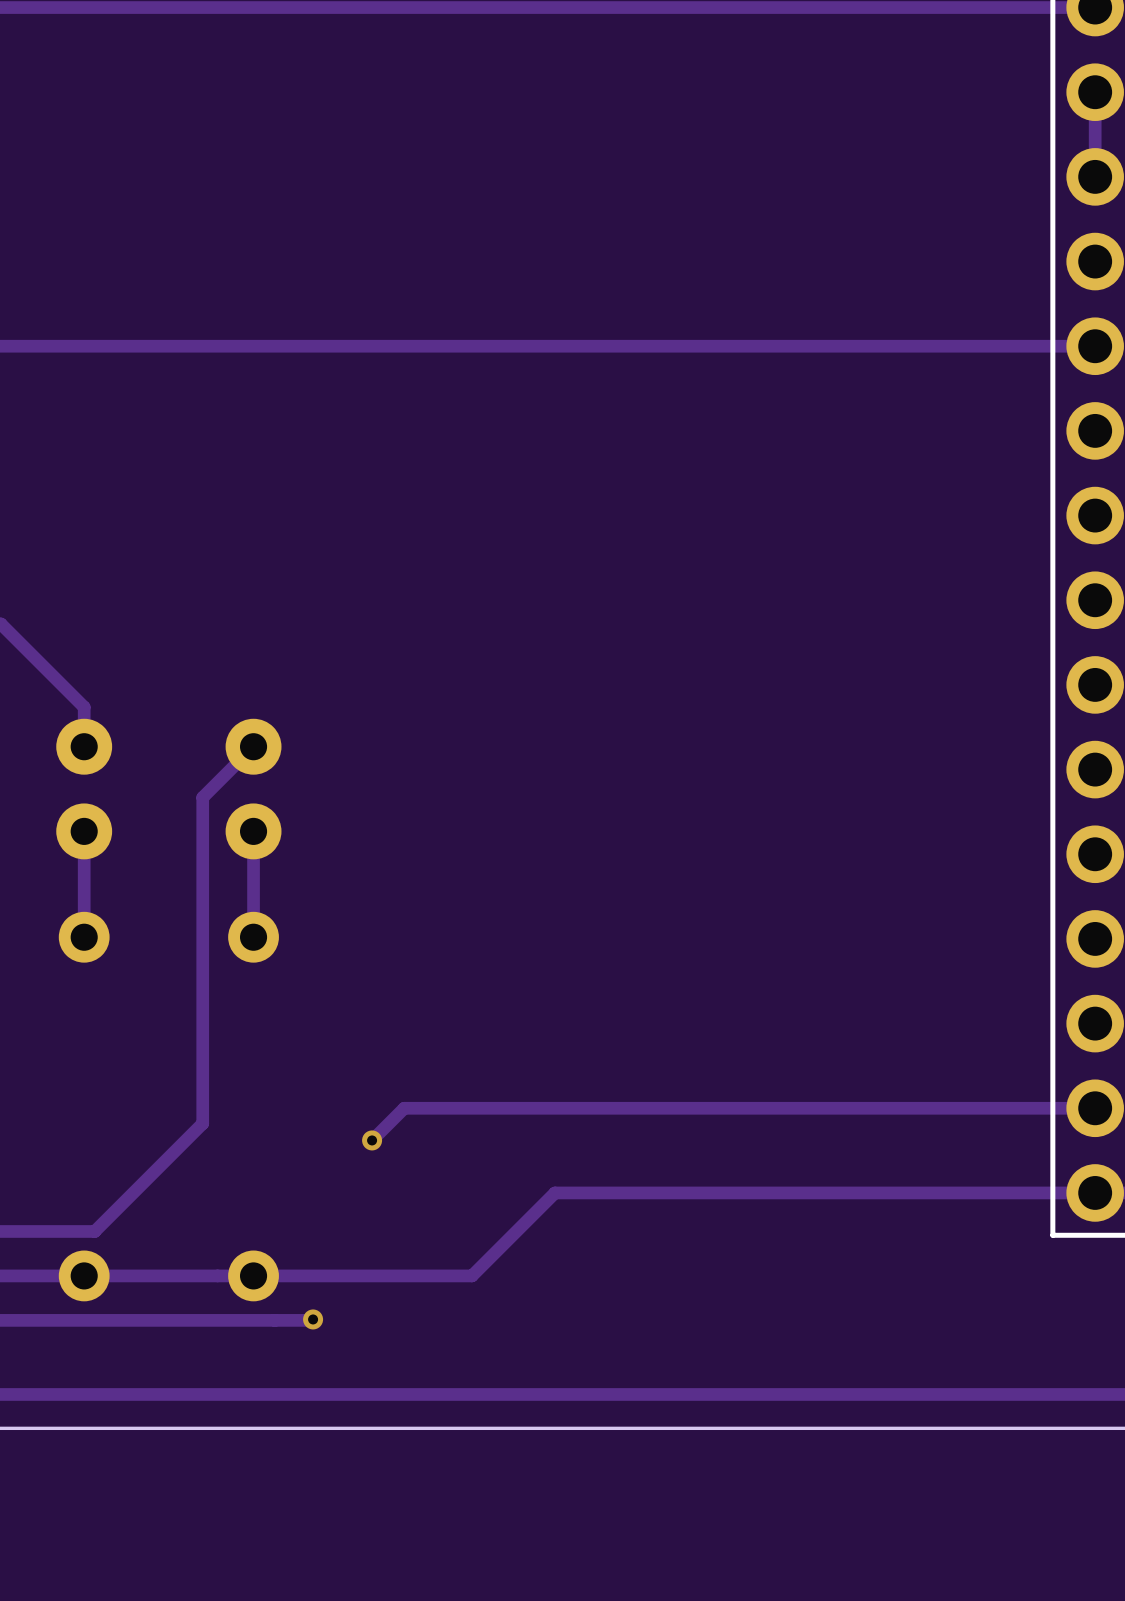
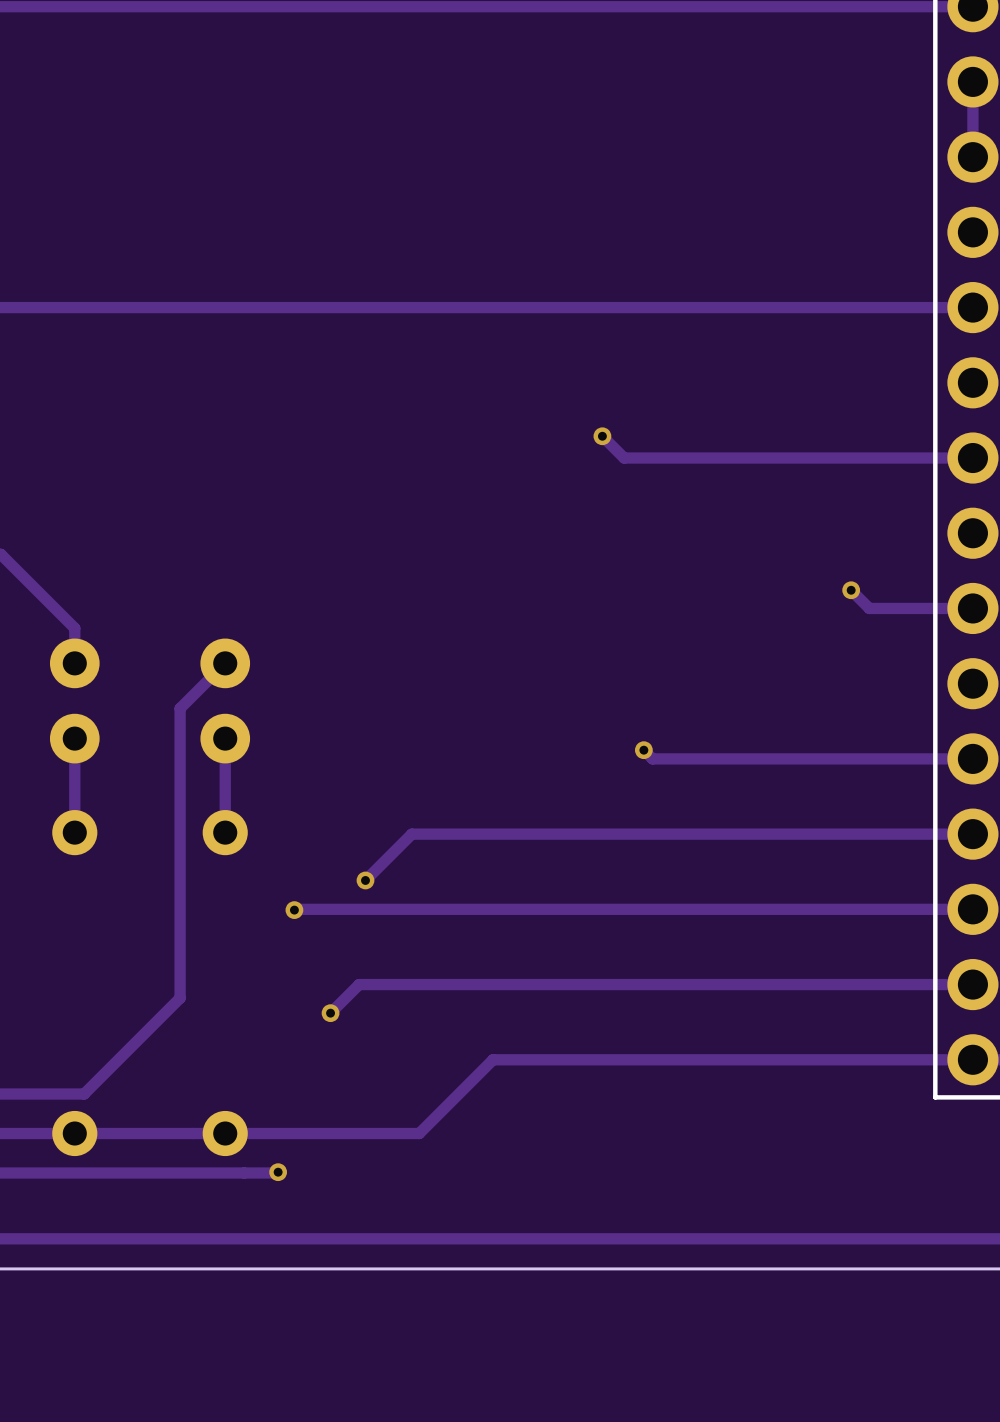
track: none -> (602, 436) (624, 458) (972, 458)
via: none -> (602, 436)
track: none -> (851, 590) (869, 608) (972, 608)
via: none -> (851, 590)
track: none -> (643, 750) (652, 758) (972, 758)
via: none -> (643, 750)
track: none -> (972, 834) (411, 834) (365, 880)
via: none -> (365, 880)
track: none -> (972, 909) (294, 910)
via: none -> (294, 910)

